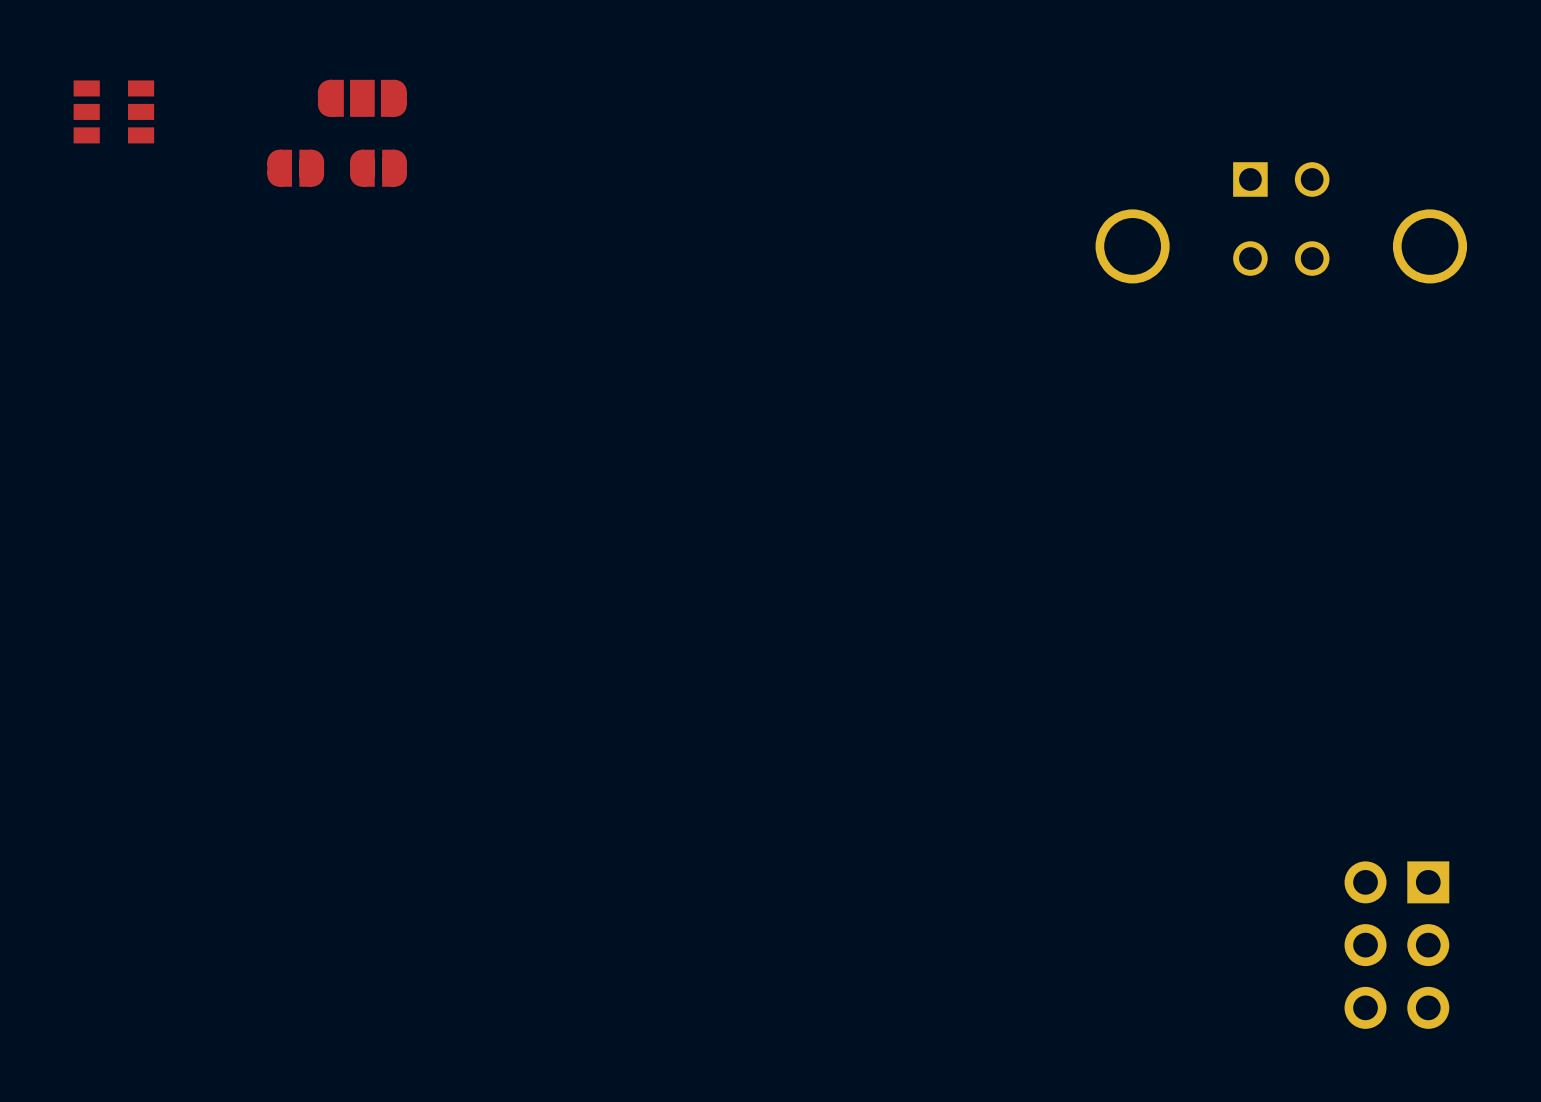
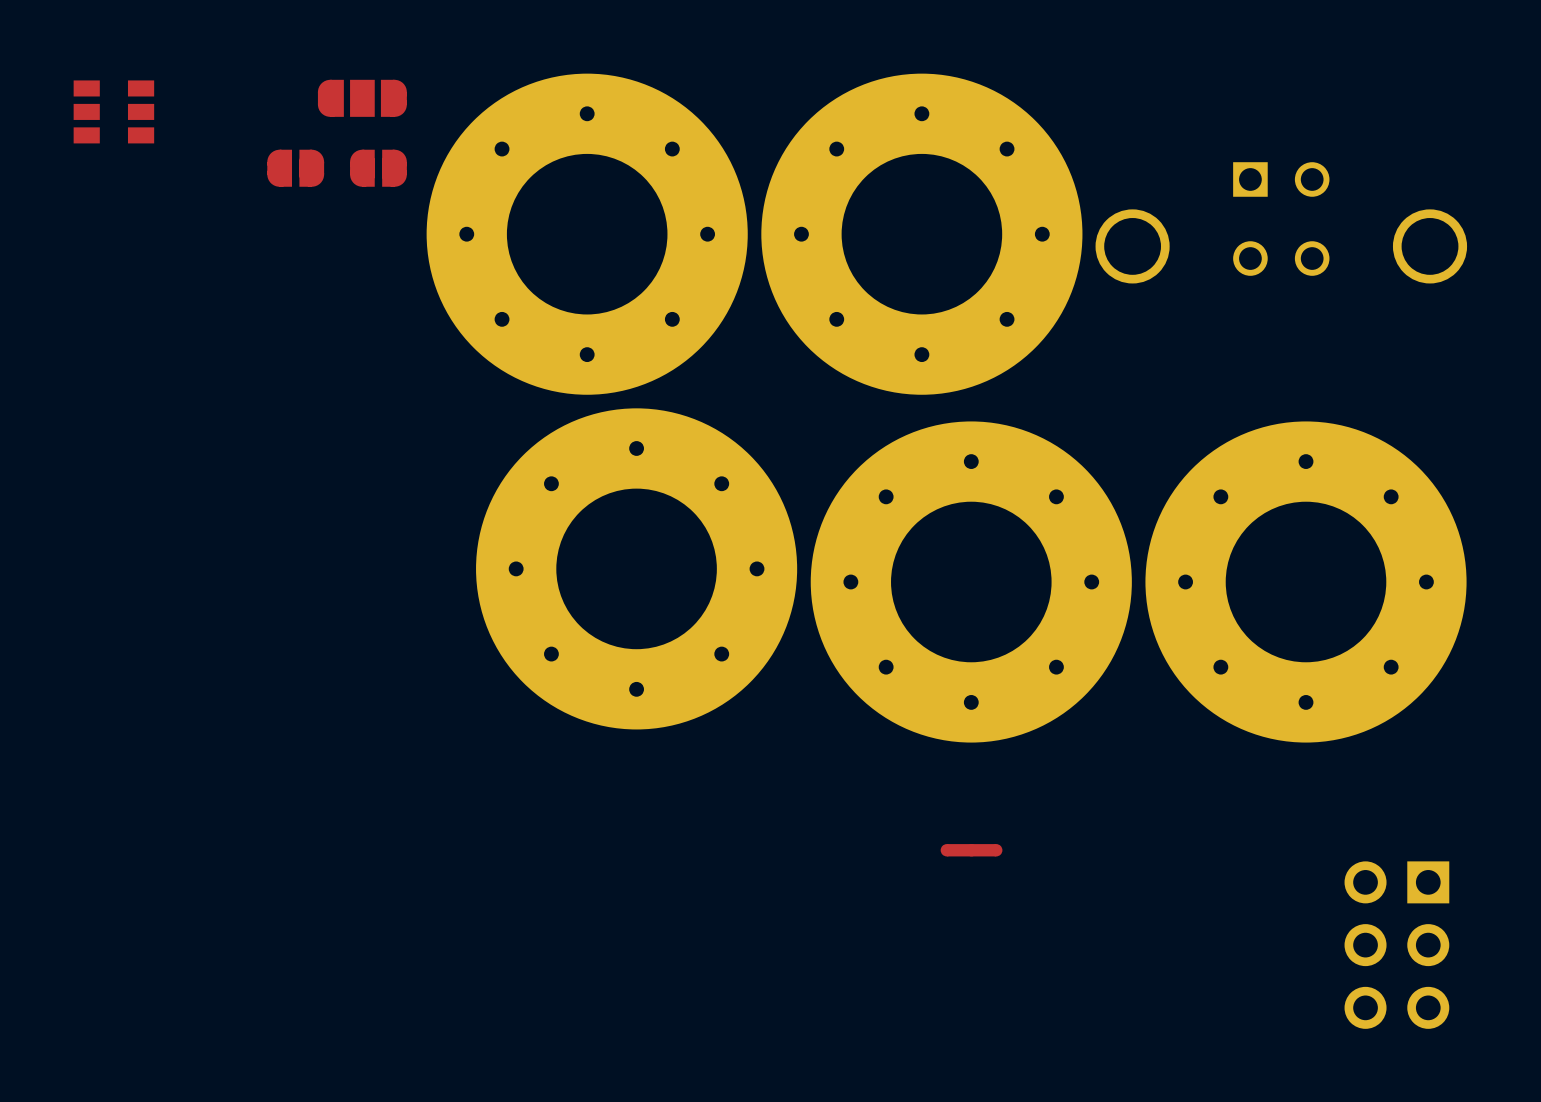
part: none -> (587, 234)
part: none -> (921, 234)
part: none -> (636, 568)
part: none -> (971, 582)
part: none -> (1306, 582)
part: none -> (971, 850)

